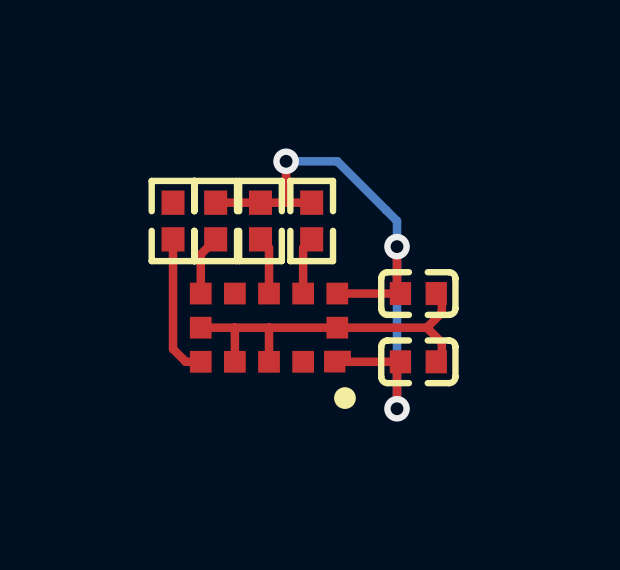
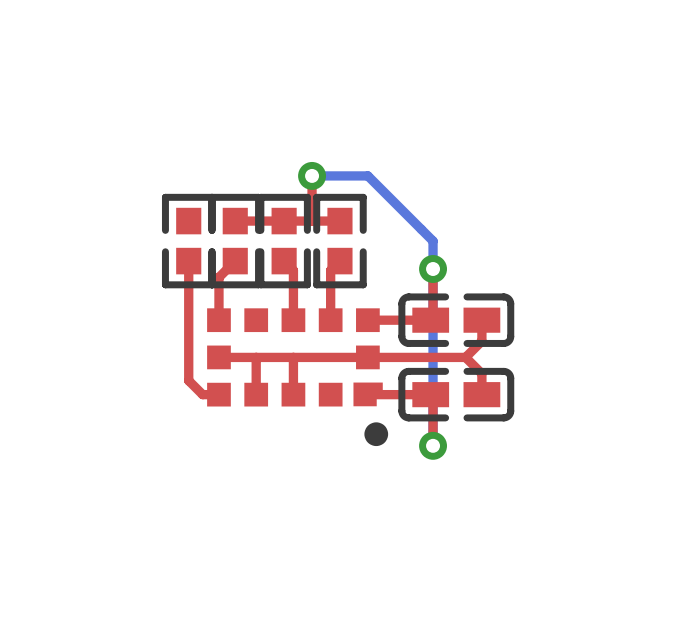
part footprint: [378, 269, 459, 319] -> [398, 293, 515, 347]
part footprint: [378, 337, 459, 387] -> [398, 367, 515, 422]

